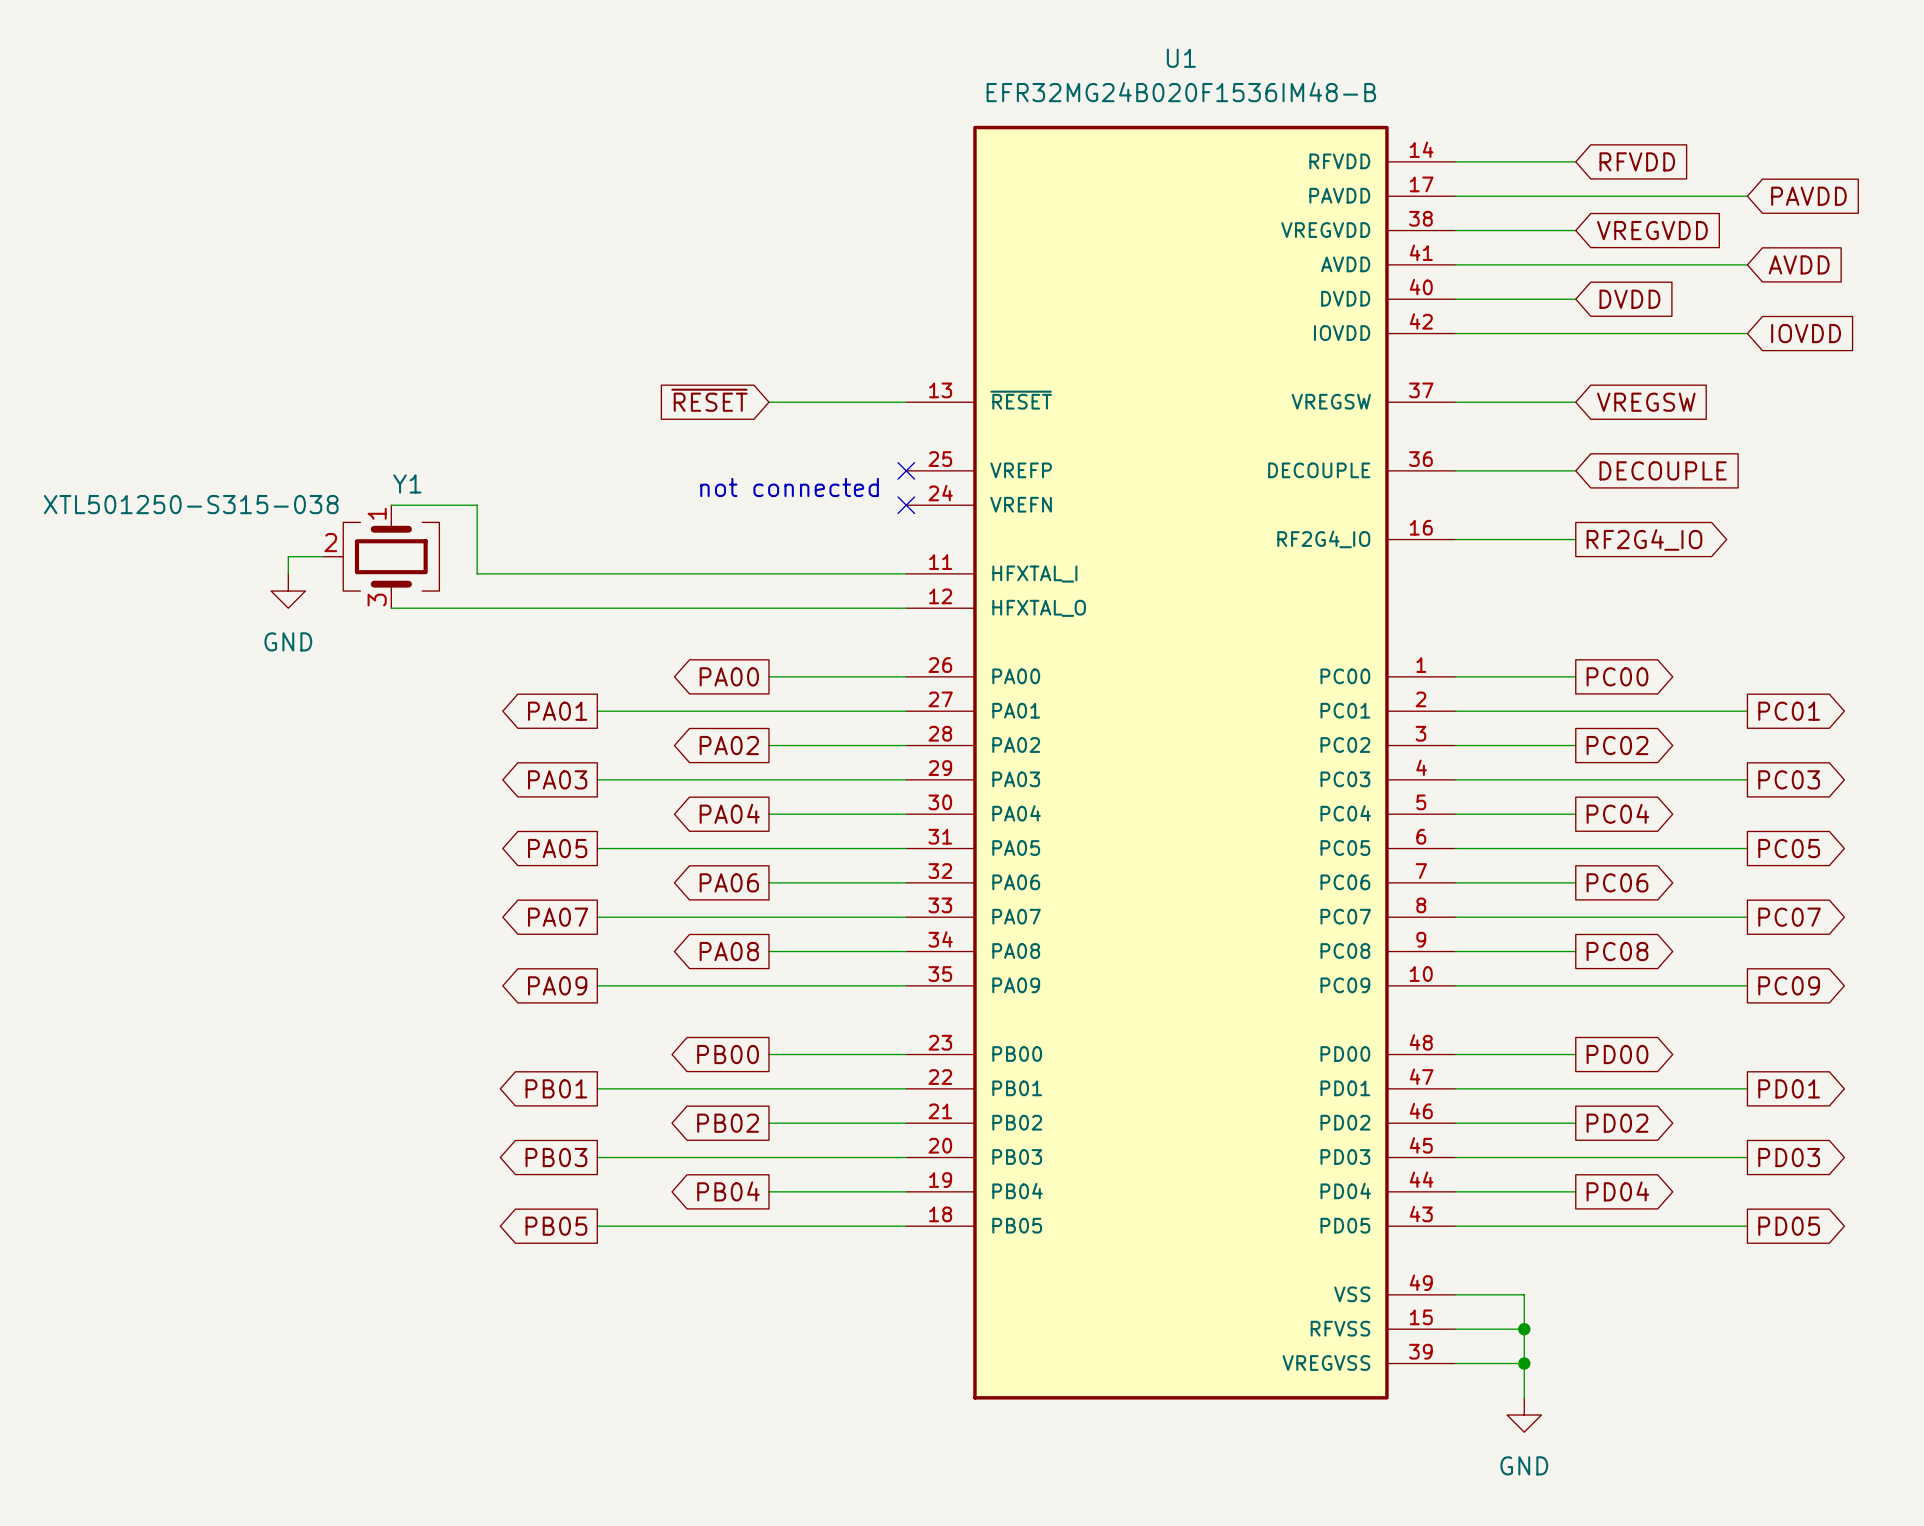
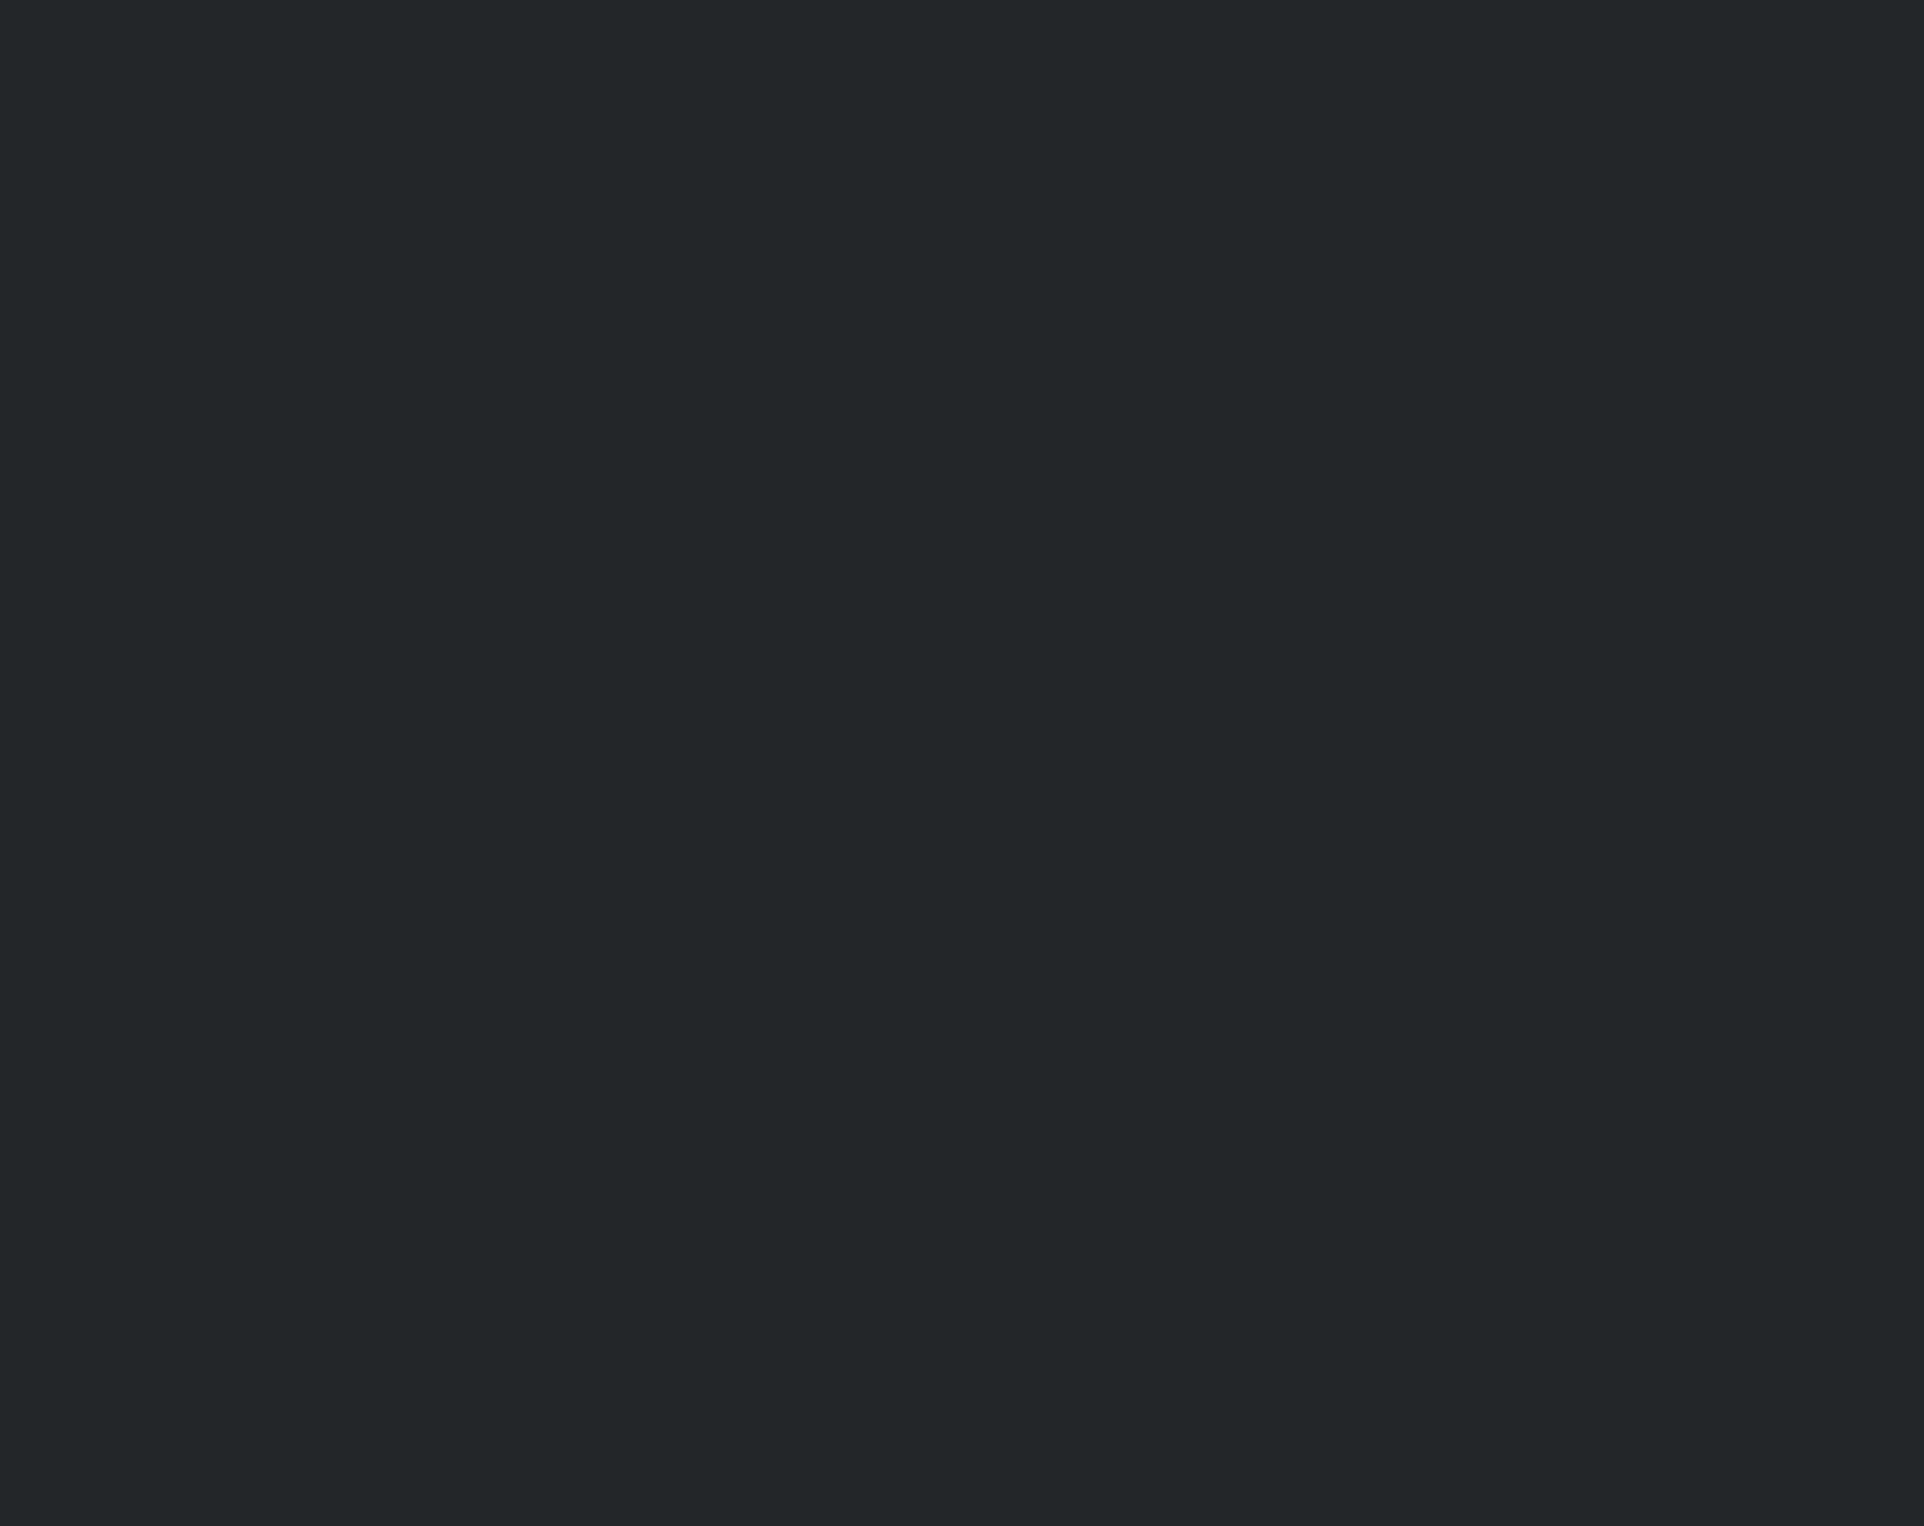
wire: (1455, 161) (1575, 161) -> none
global label: RFVDD (1637, 161) -> none
wire: (1455, 196) (1747, 196) -> none
global label: PAVDD (1808, 196) -> none
wire: (1455, 230) (1575, 230) -> none
global label: VREGVDD (1652, 230) -> none
wire: (1455, 264) (1747, 264) -> none
global label: AVDD (1799, 264) -> none
wire: (1455, 299) (1575, 299) -> none
global label: DVDD (1629, 299) -> none
wire: (1455, 333) (1747, 333) -> none
global label: IOVDD (1806, 333) -> none
global label: ~{RESET} (709, 400) -> none
wire: (768, 402) (906, 402) -> none
wire: (1455, 402) (1575, 402) -> none
global label: VREGSW (1646, 402) -> none
no-connect mark: (906, 470) -> none
wire: (1455, 470) (1575, 470) -> none
global label: DECOUPLE (1663, 470) -> none
text: not connected (789, 487) -> none
wire: (391, 505) (477, 505) (477, 573) (906, 573) -> none
no-connect mark: (906, 505) -> none
wire: (1455, 539) (1575, 539) -> none
global label: RF2G4_IO (1644, 539) -> none
wire: (322, 556) (288, 556) (288, 573) -> none
Y1: XTL501250-S315-038 (381, 556) -> none
power symbol: GND (288, 591) -> none
wire: (391, 608) (906, 608) -> none
global label: PA00 (729, 676) -> none
wire: (768, 676) (906, 676) -> none
wire: (1455, 676) (1575, 676) -> none
global label: PC00 (1617, 676) -> none
global label: PA01 (557, 711) -> none
wire: (597, 711) (906, 711) -> none
wire: (1455, 711) (1747, 711) -> none
global label: PC01 (1789, 711) -> none
global label: PA02 (729, 745) -> none
wire: (768, 745) (906, 745) -> none
wire: (1455, 745) (1575, 745) -> none
global label: PC02 (1617, 745) -> none
U1: EFR32MG24B020F1536IM48-B (1180, 762) -> none
global label: PA03 (557, 779) -> none
wire: (597, 779) (906, 779) -> none
wire: (1455, 779) (1747, 779) -> none
global label: PC03 (1789, 779) -> none
global label: PA04 (729, 813) -> none
global label: PC04 (1617, 813) -> none
wire: (768, 814) (906, 814) -> none
wire: (1455, 814) (1575, 814) -> none
global label: PA05 (557, 848) -> none
wire: (597, 848) (906, 848) -> none
wire: (1455, 848) (1747, 848) -> none
global label: PC05 (1789, 848) -> none
global label: PA06 (729, 882) -> none
wire: (768, 882) (906, 882) -> none
wire: (1455, 882) (1575, 882) -> none
global label: PC06 (1617, 882) -> none
global label: PA07 (558, 917) -> none
wire: (597, 917) (906, 917) -> none
wire: (1455, 917) (1747, 917) -> none
global label: PC07 (1789, 917) -> none
global label: PA08 (729, 951) -> none
wire: (768, 951) (906, 951) -> none
wire: (1455, 951) (1575, 951) -> none
global label: PC08 (1617, 951) -> none
global label: PA09 (557, 985) -> none
wire: (597, 985) (906, 985) -> none
wire: (1455, 985) (1747, 985) -> none
global label: PC09 (1789, 985) -> none
global label: PB00 (728, 1054) -> none
wire: (768, 1054) (906, 1054) -> none
wire: (1455, 1054) (1575, 1054) -> none
global label: PD00 (1617, 1054) -> none
global label: PB01 (556, 1088) -> none
wire: (597, 1088) (906, 1088) -> none
wire: (1455, 1088) (1747, 1088) -> none
global label: PD01 (1789, 1088) -> none
global label: PB02 (728, 1123) -> none
wire: (768, 1123) (906, 1123) -> none
wire: (1455, 1123) (1575, 1123) -> none
global label: PD02 (1617, 1123) -> none
global label: PB03 (556, 1157) -> none
wire: (597, 1157) (906, 1157) -> none
wire: (1455, 1157) (1747, 1157) -> none
global label: PD03 (1789, 1157) -> none
global label: PB04 (728, 1191) -> none
wire: (768, 1191) (906, 1191) -> none
wire: (1455, 1191) (1575, 1191) -> none
global label: PD04 (1617, 1191) -> none
global label: PB05 (556, 1226) -> none
wire: (597, 1226) (906, 1226) -> none
wire: (1455, 1226) (1747, 1226) -> none
global label: PD05 (1789, 1226) -> none
wire: (1455, 1294) (1524, 1294) (1524, 1397) -> none
wire: (1455, 1329) (1524, 1329) -> none
junction: (1524, 1329) -> none
wire: (1455, 1363) (1524, 1363) -> none
junction: (1524, 1363) -> none
power symbol: GND (1524, 1415) -> none

